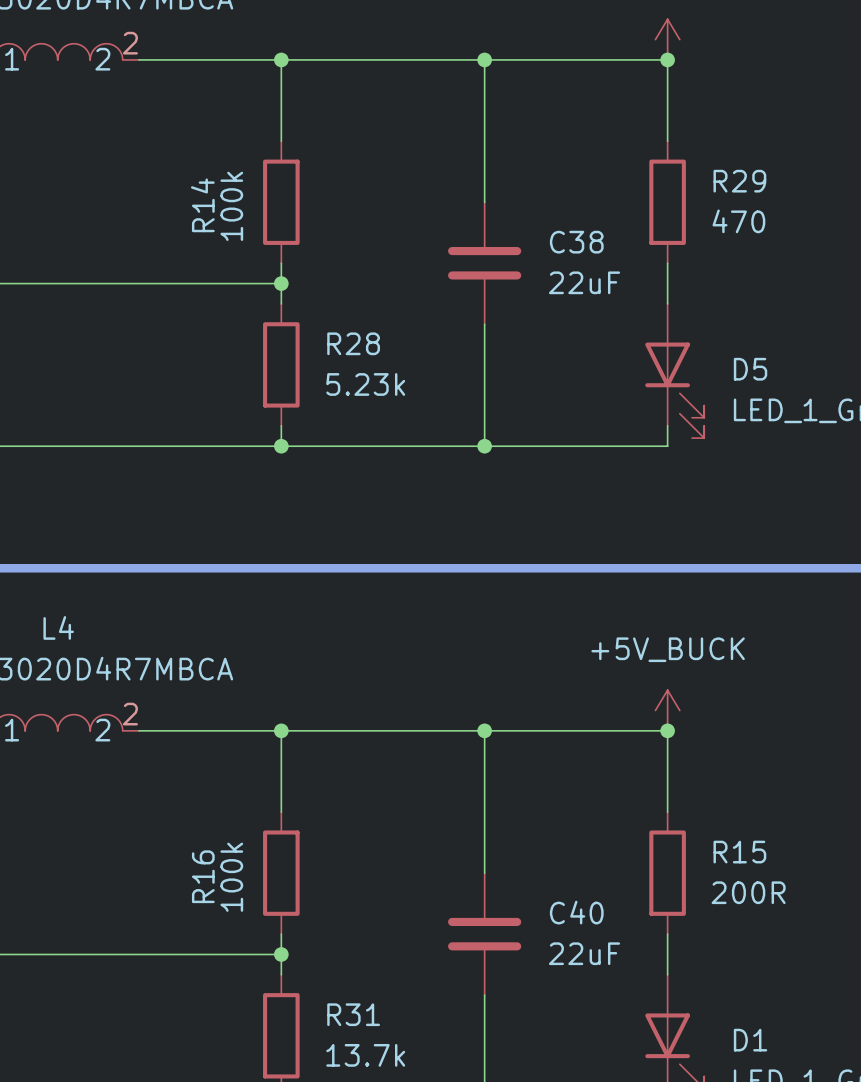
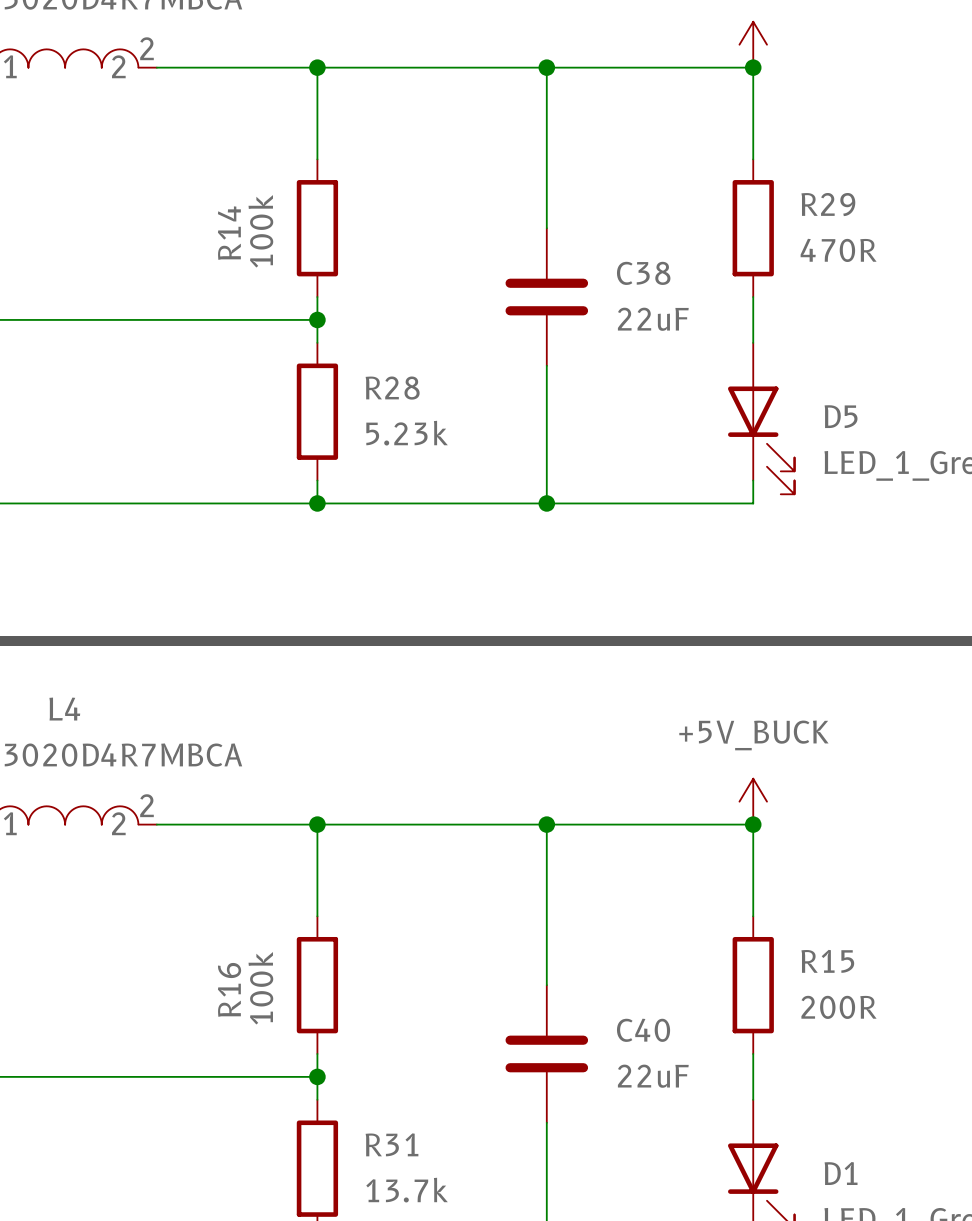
R29 value: 470 (738, 221) -> 470R (838, 250)

